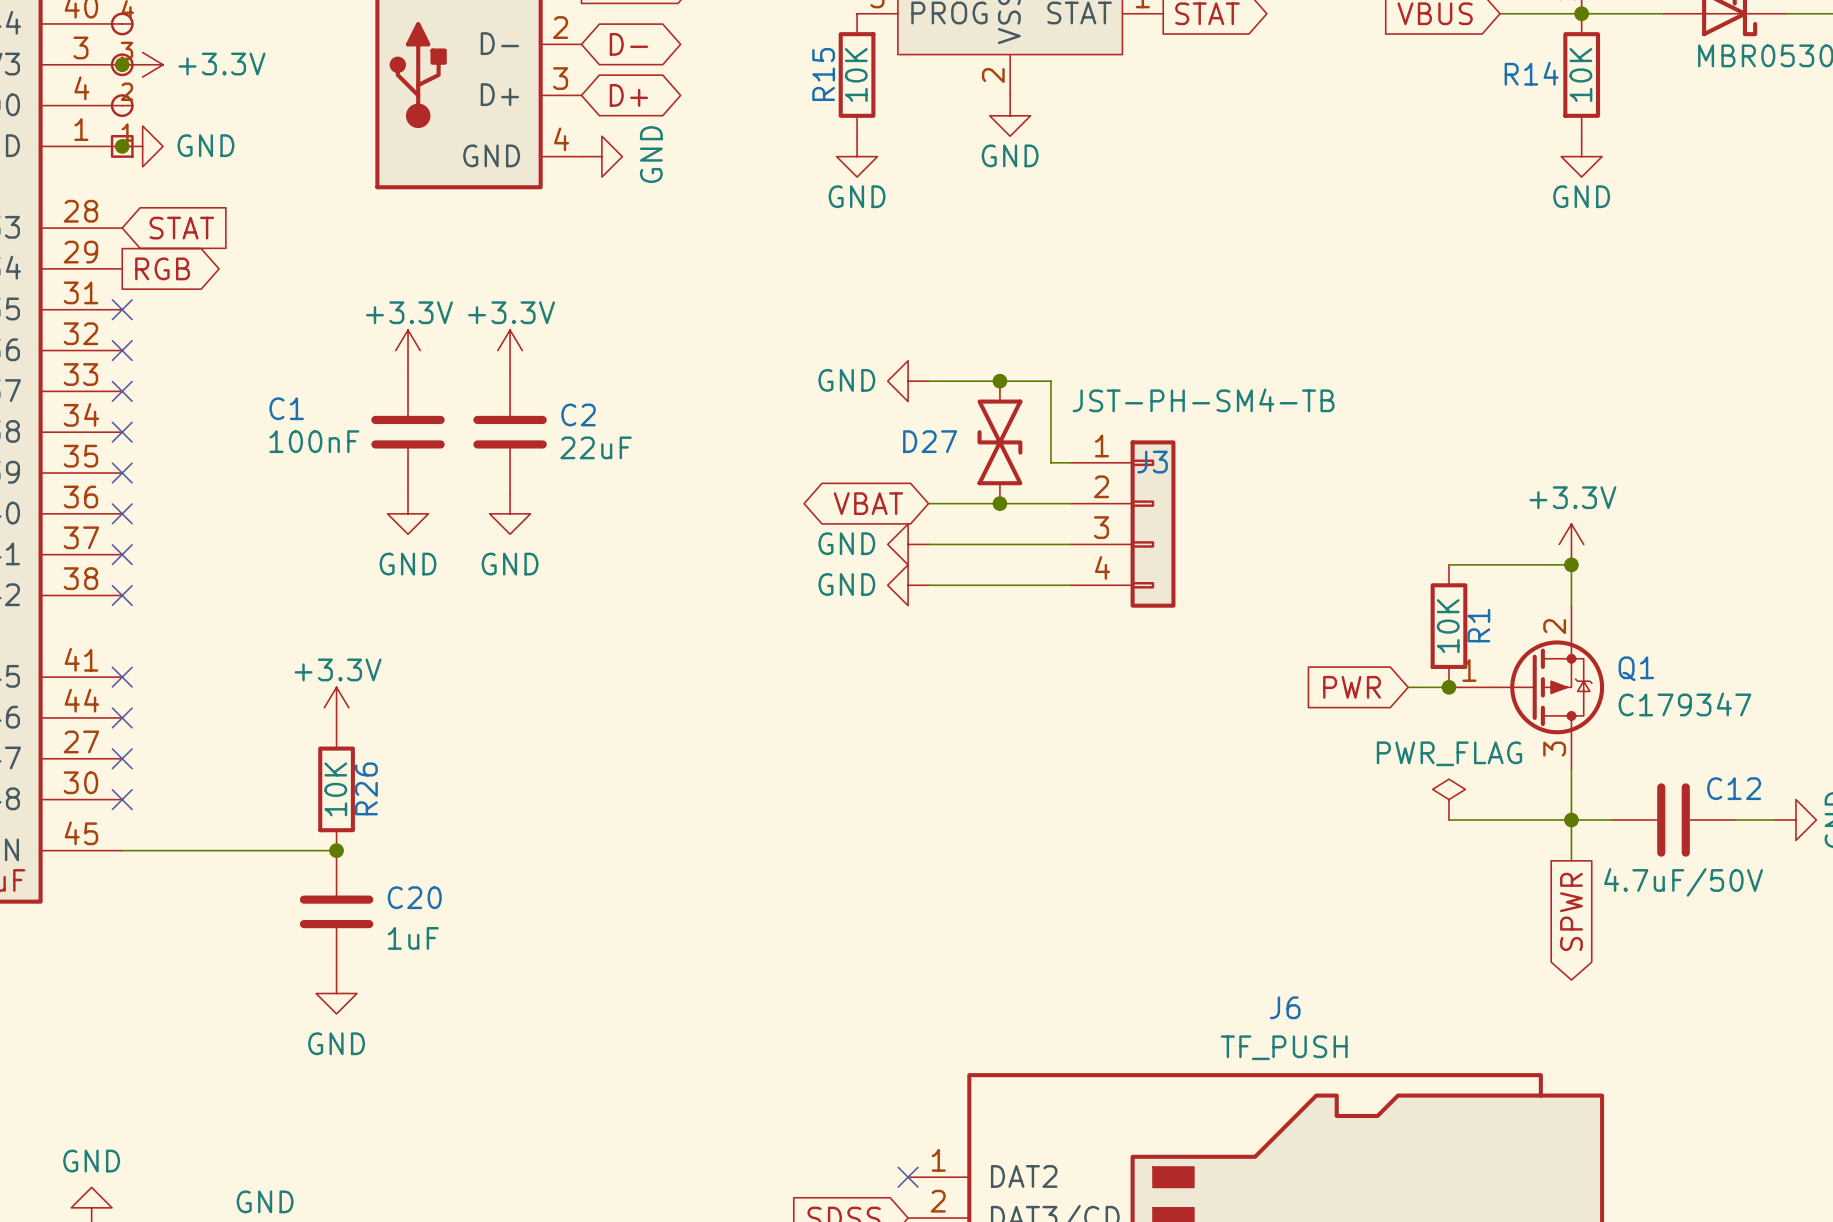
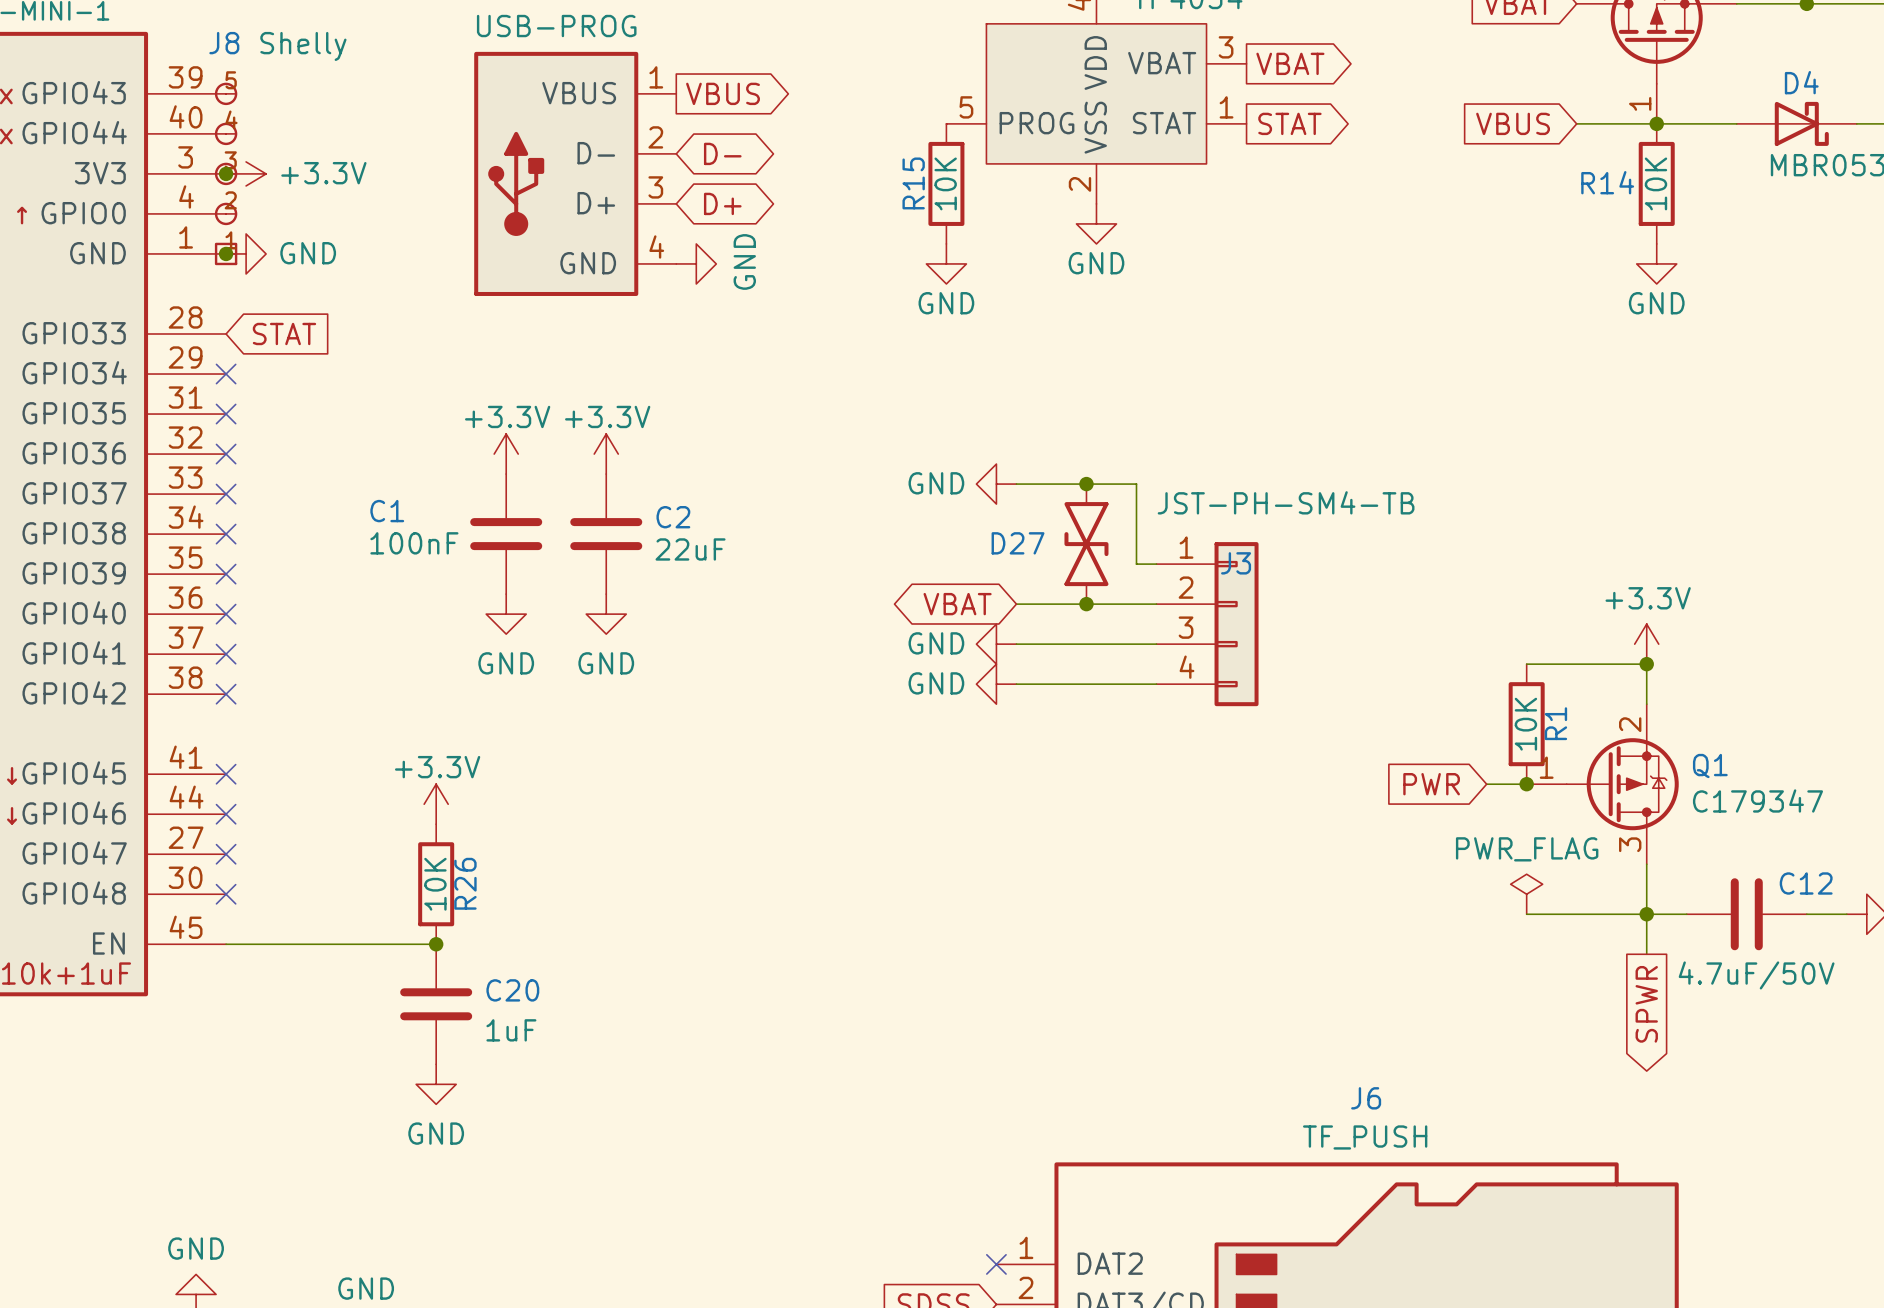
no-connect mark: none -> (226, 374)
global label: RGB (162, 268) -> none

